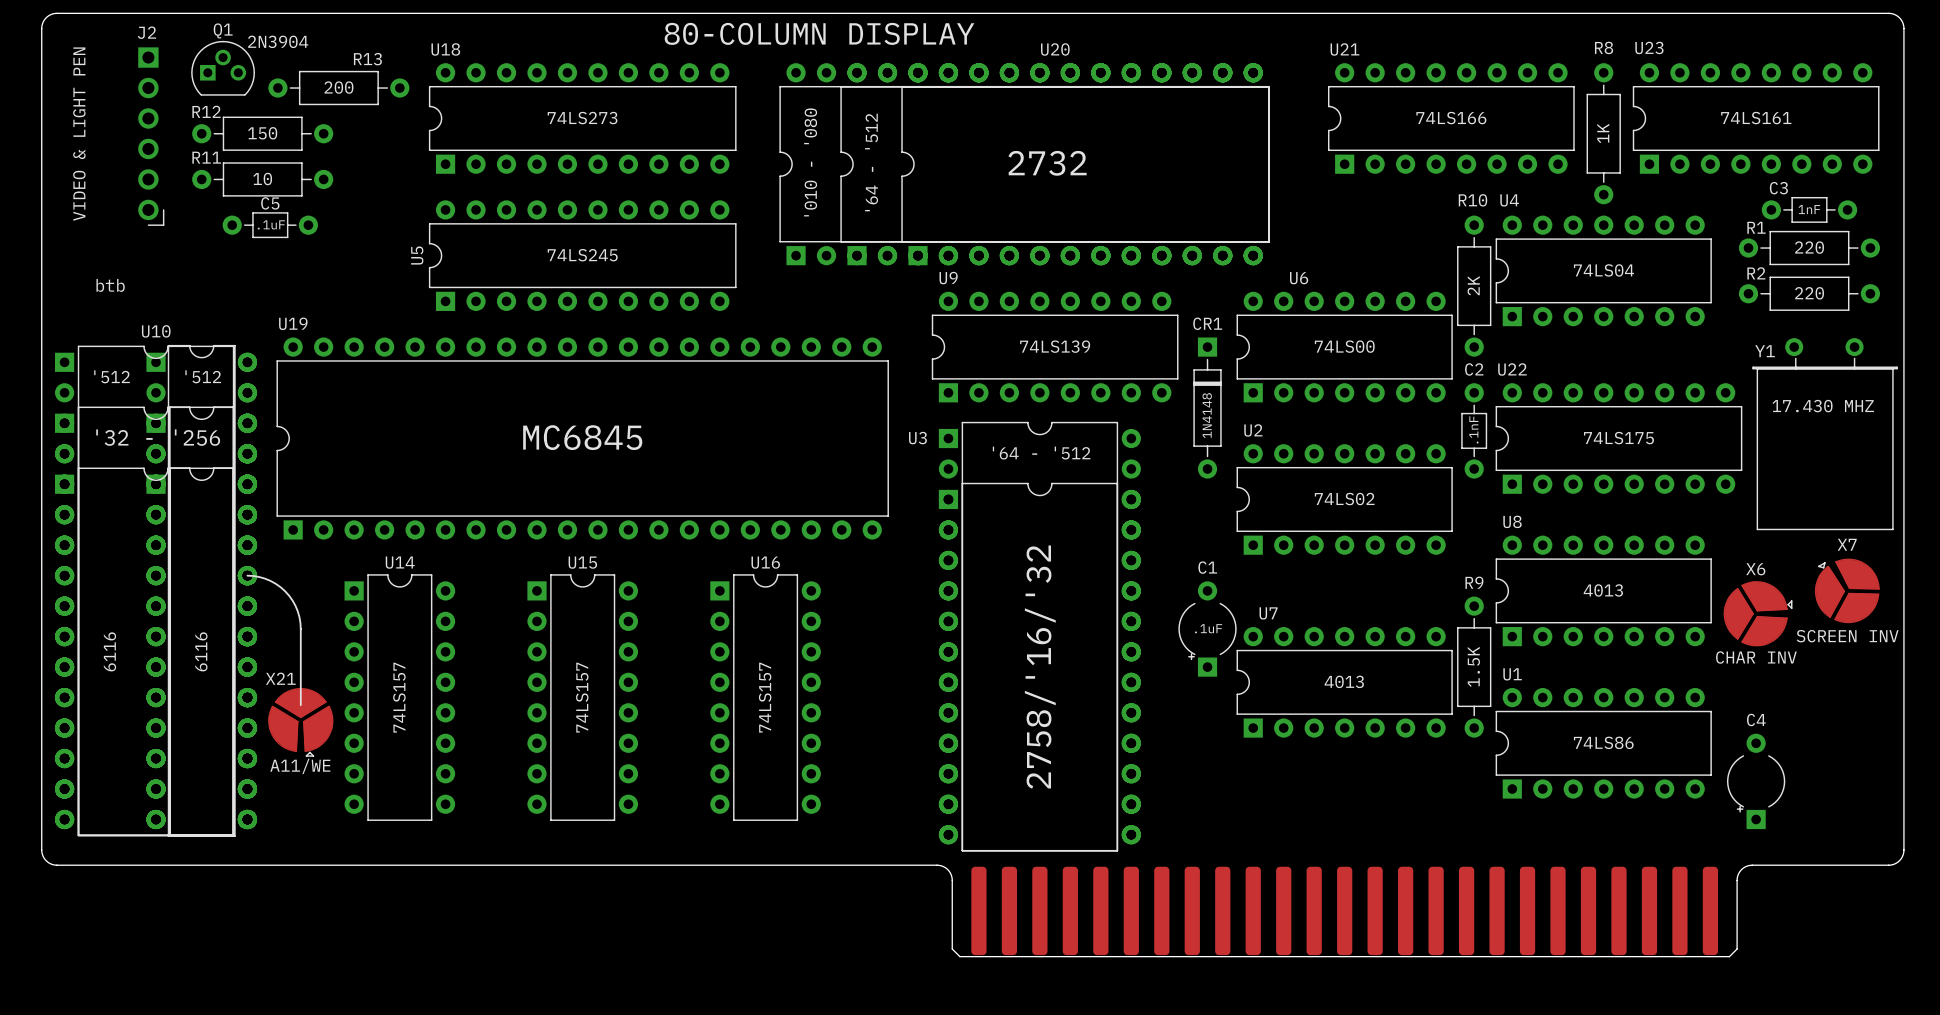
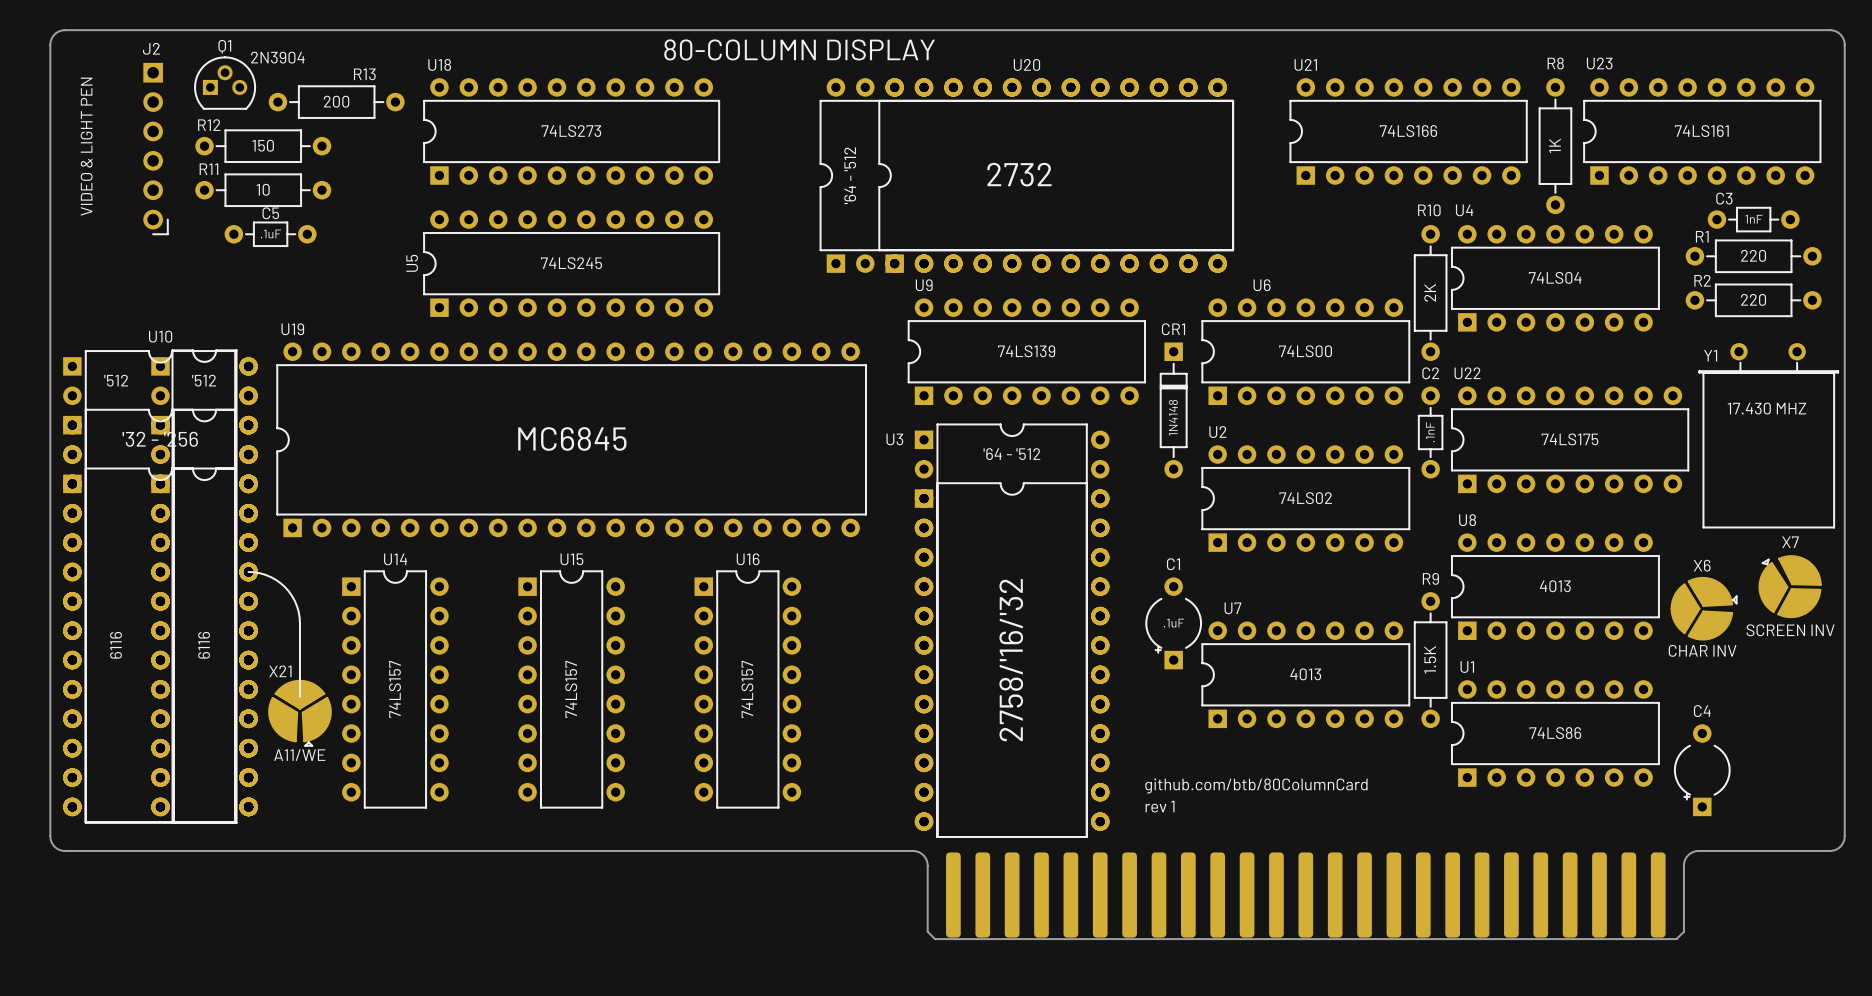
part: '010 - '080 (1024, 164) -> none
text: btb (110, 285) -> none
text: none -> github.com/btb/80ColumnCard (1256, 786)
text: none -> rev 1 (1160, 806)

